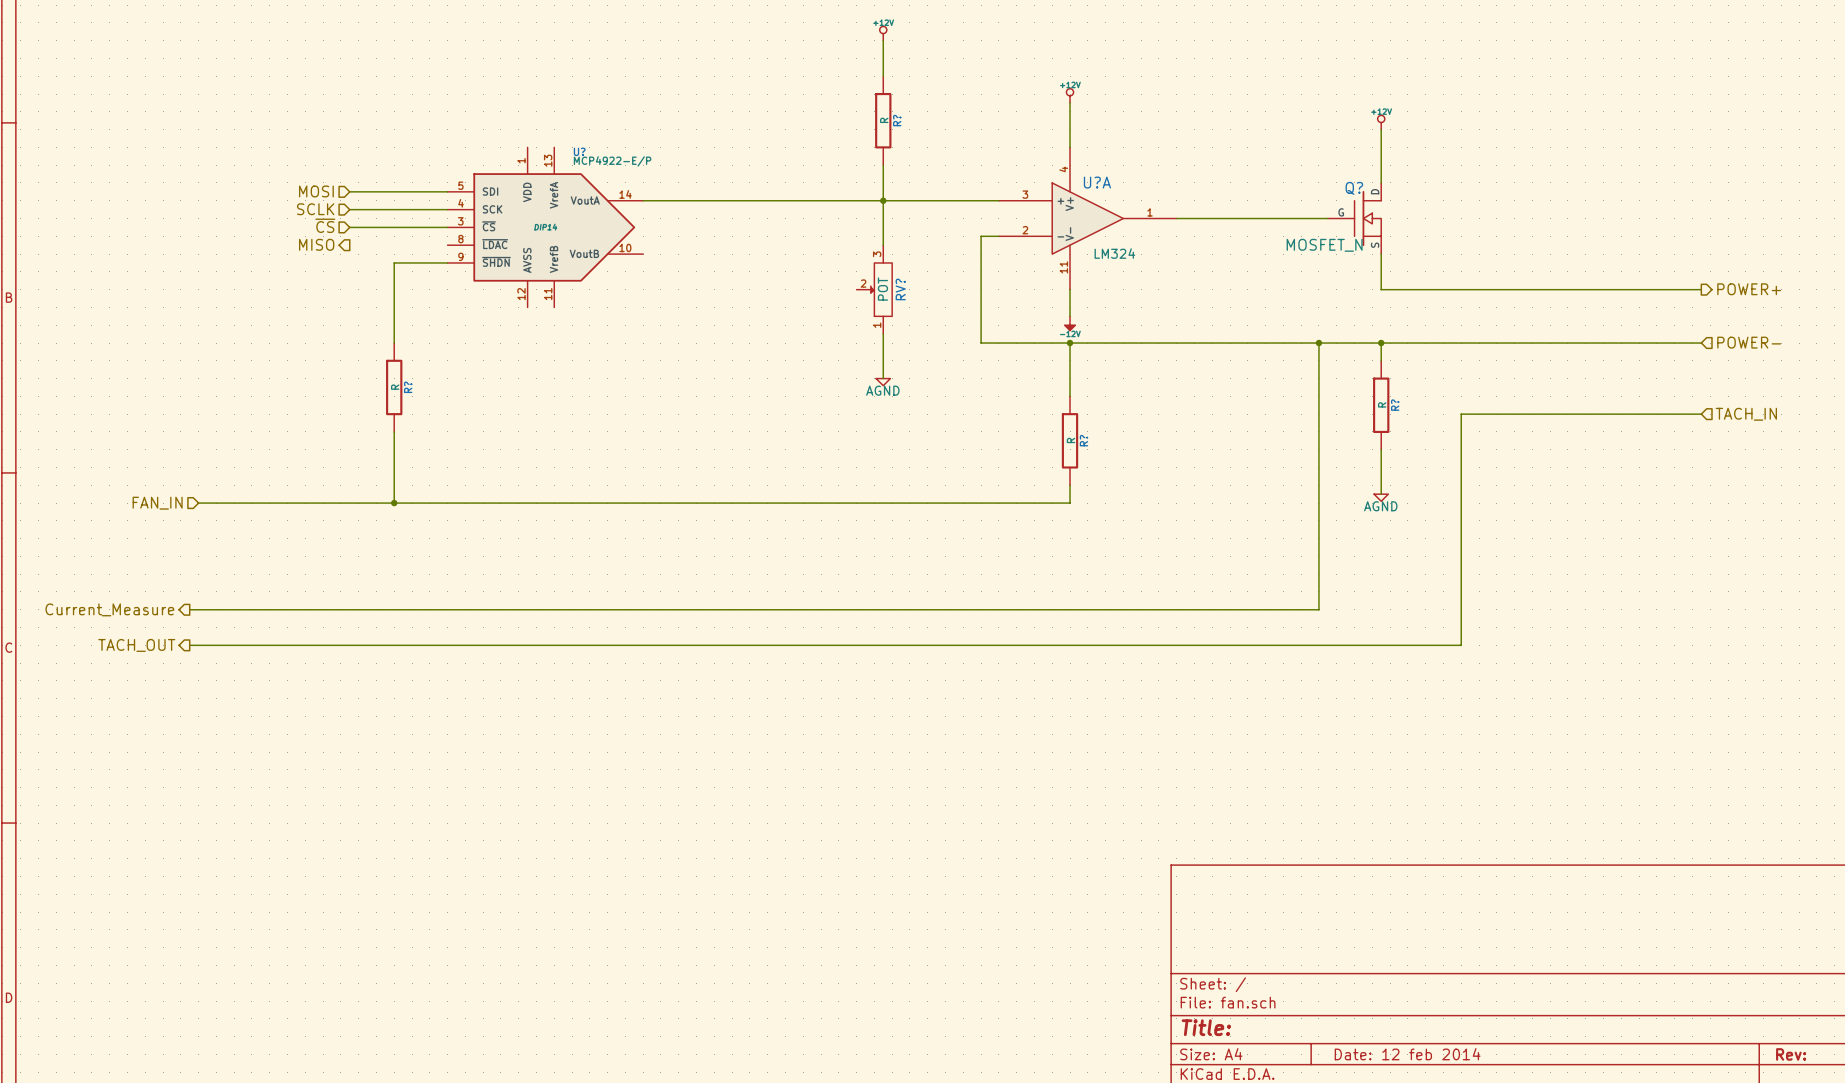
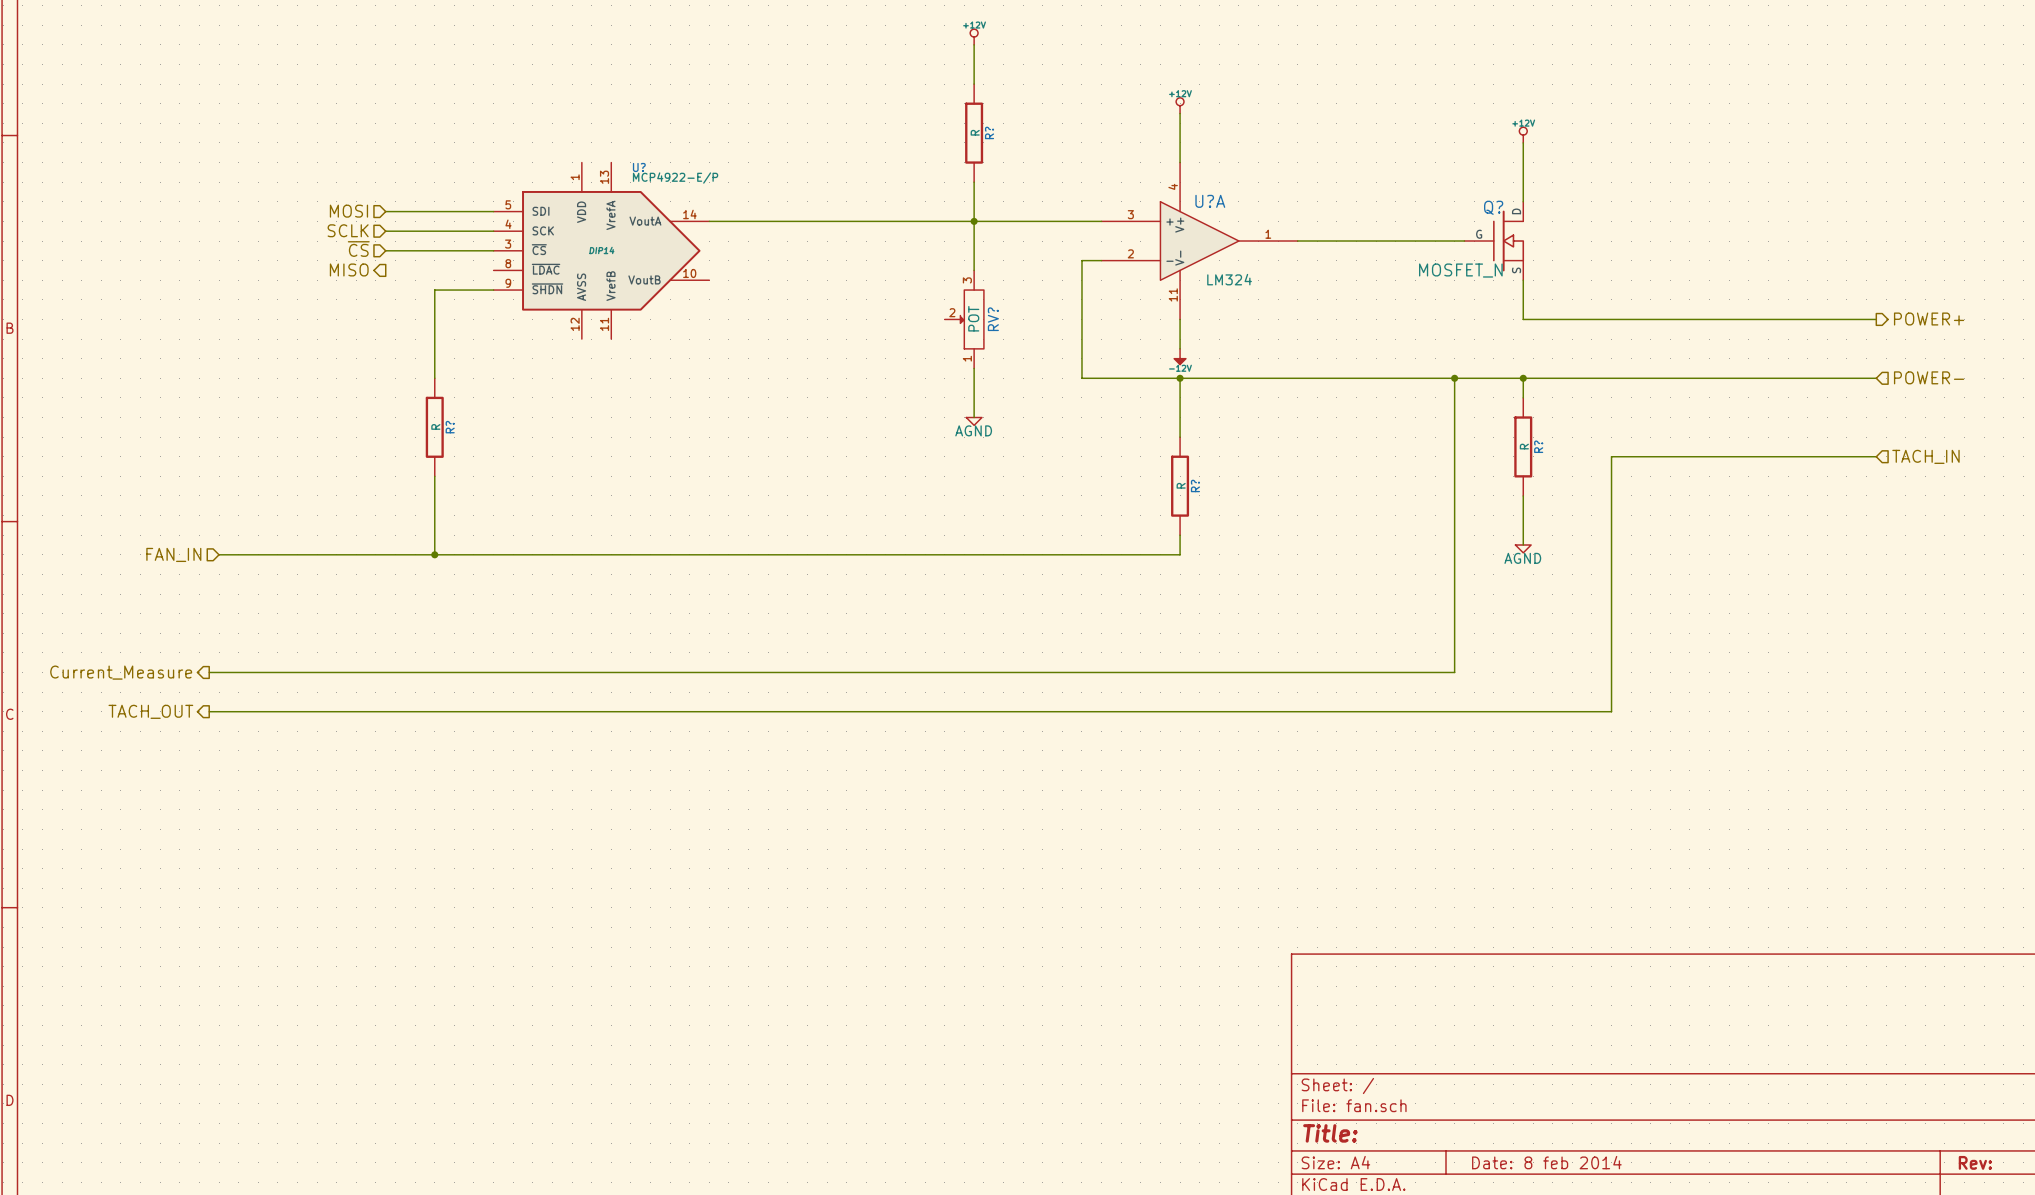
title block: Date: 12 feb 2014 (1407, 1054) -> Date: 8 feb 2014 (1546, 1162)

